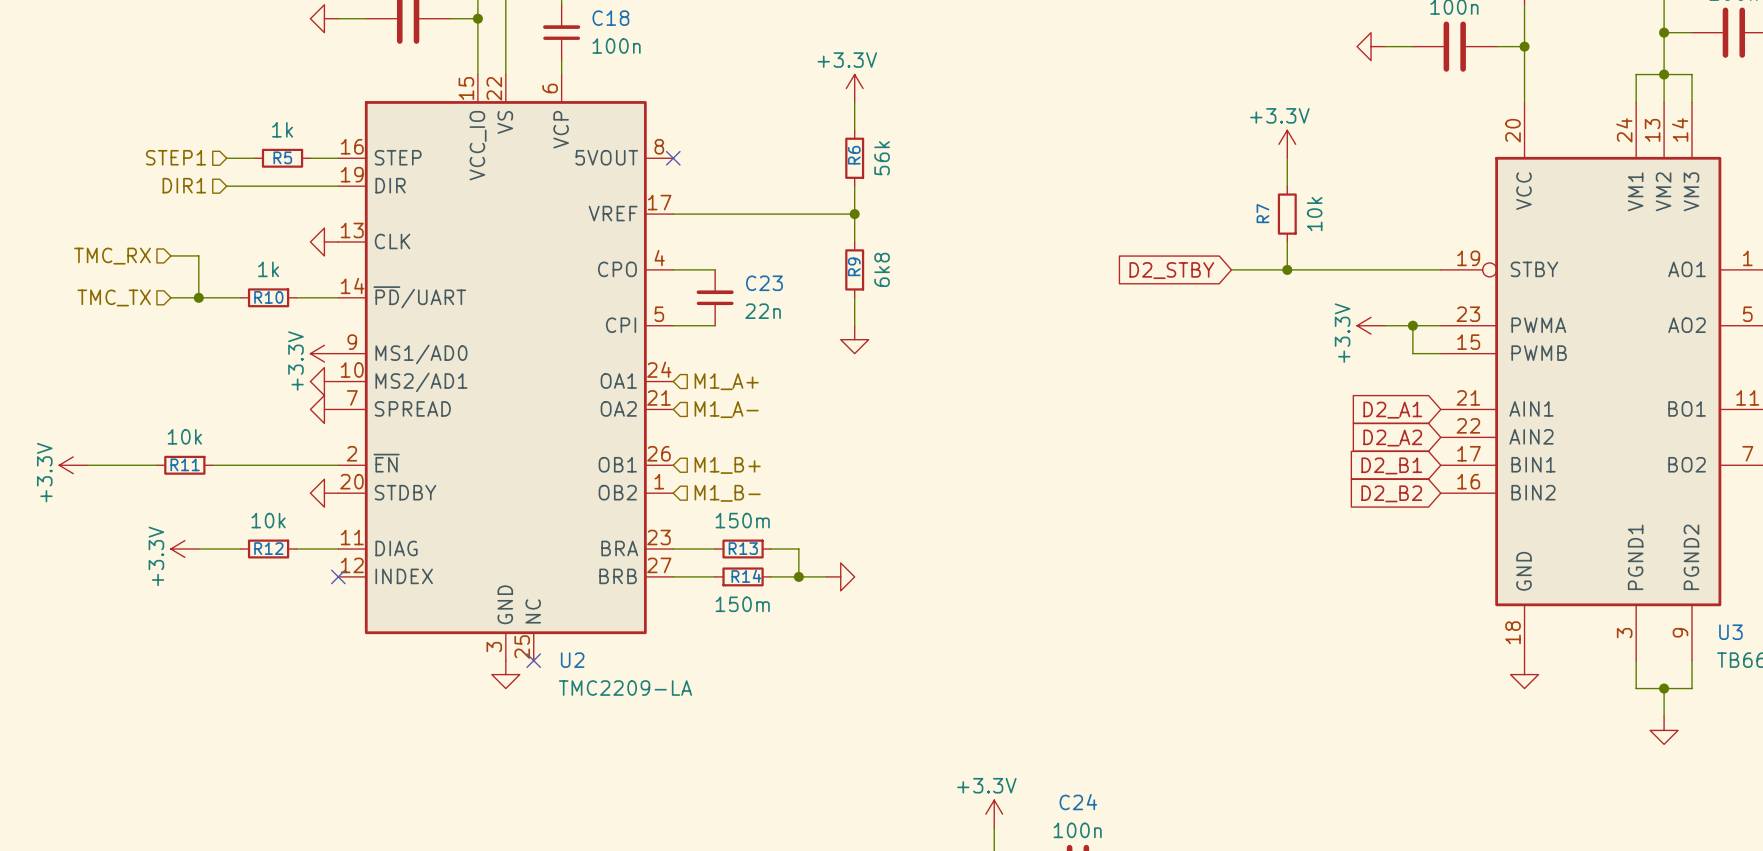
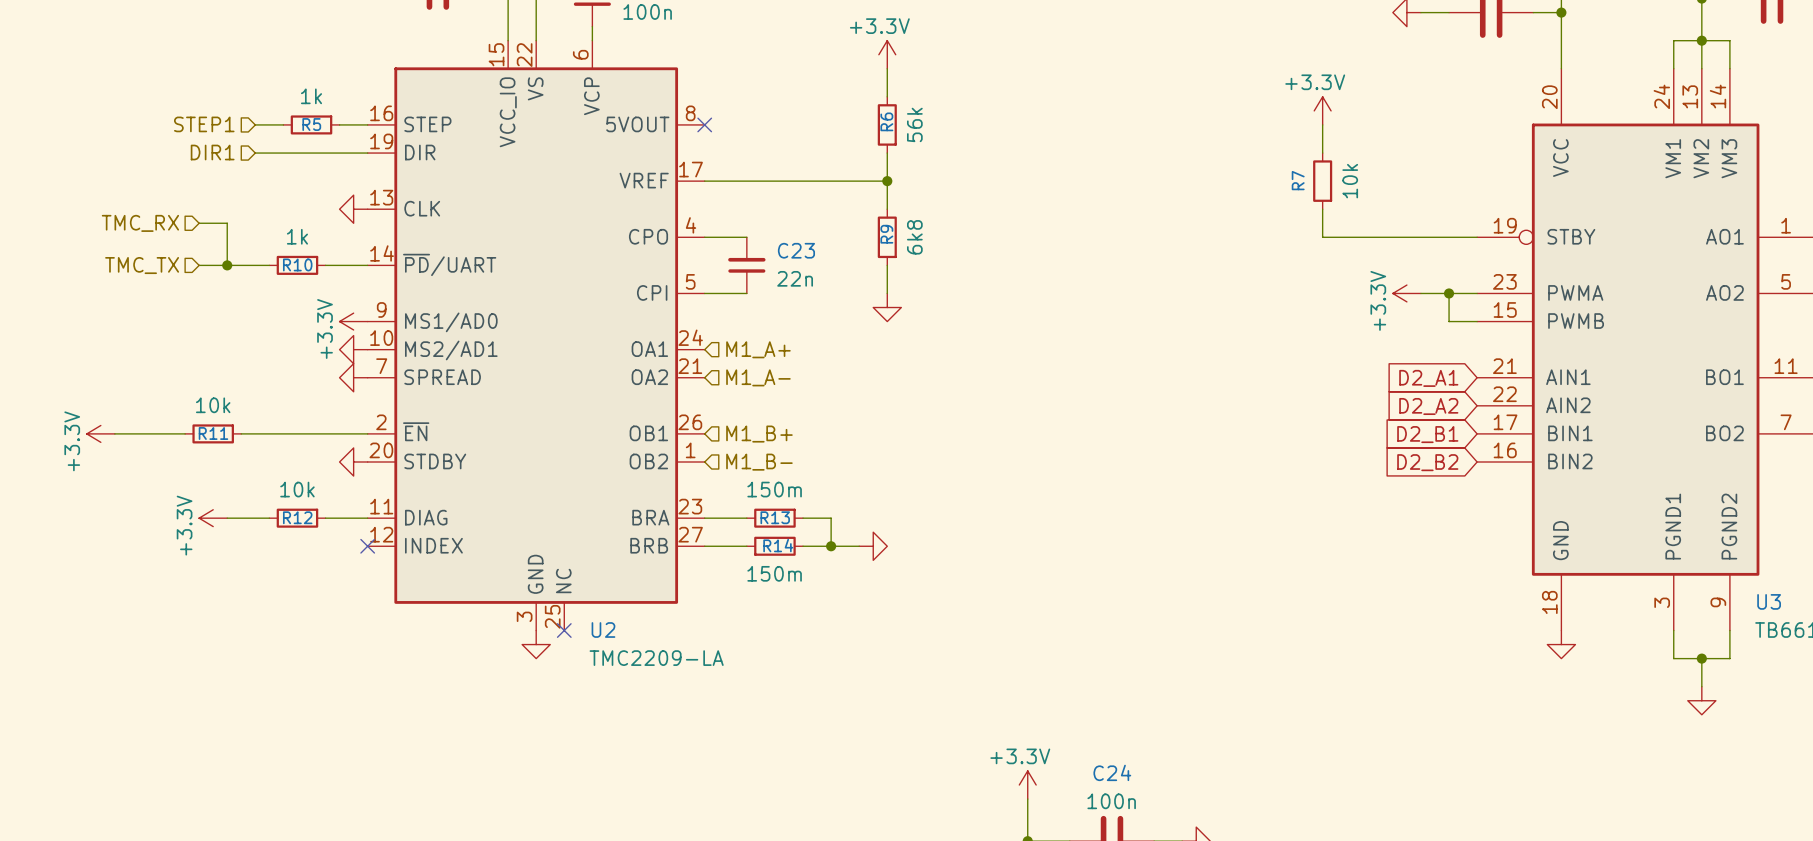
wire: (1231, 269) (1287, 269) -> none
junction: (1287, 269) -> none
global label: D2_STBY (1171, 270) -> none

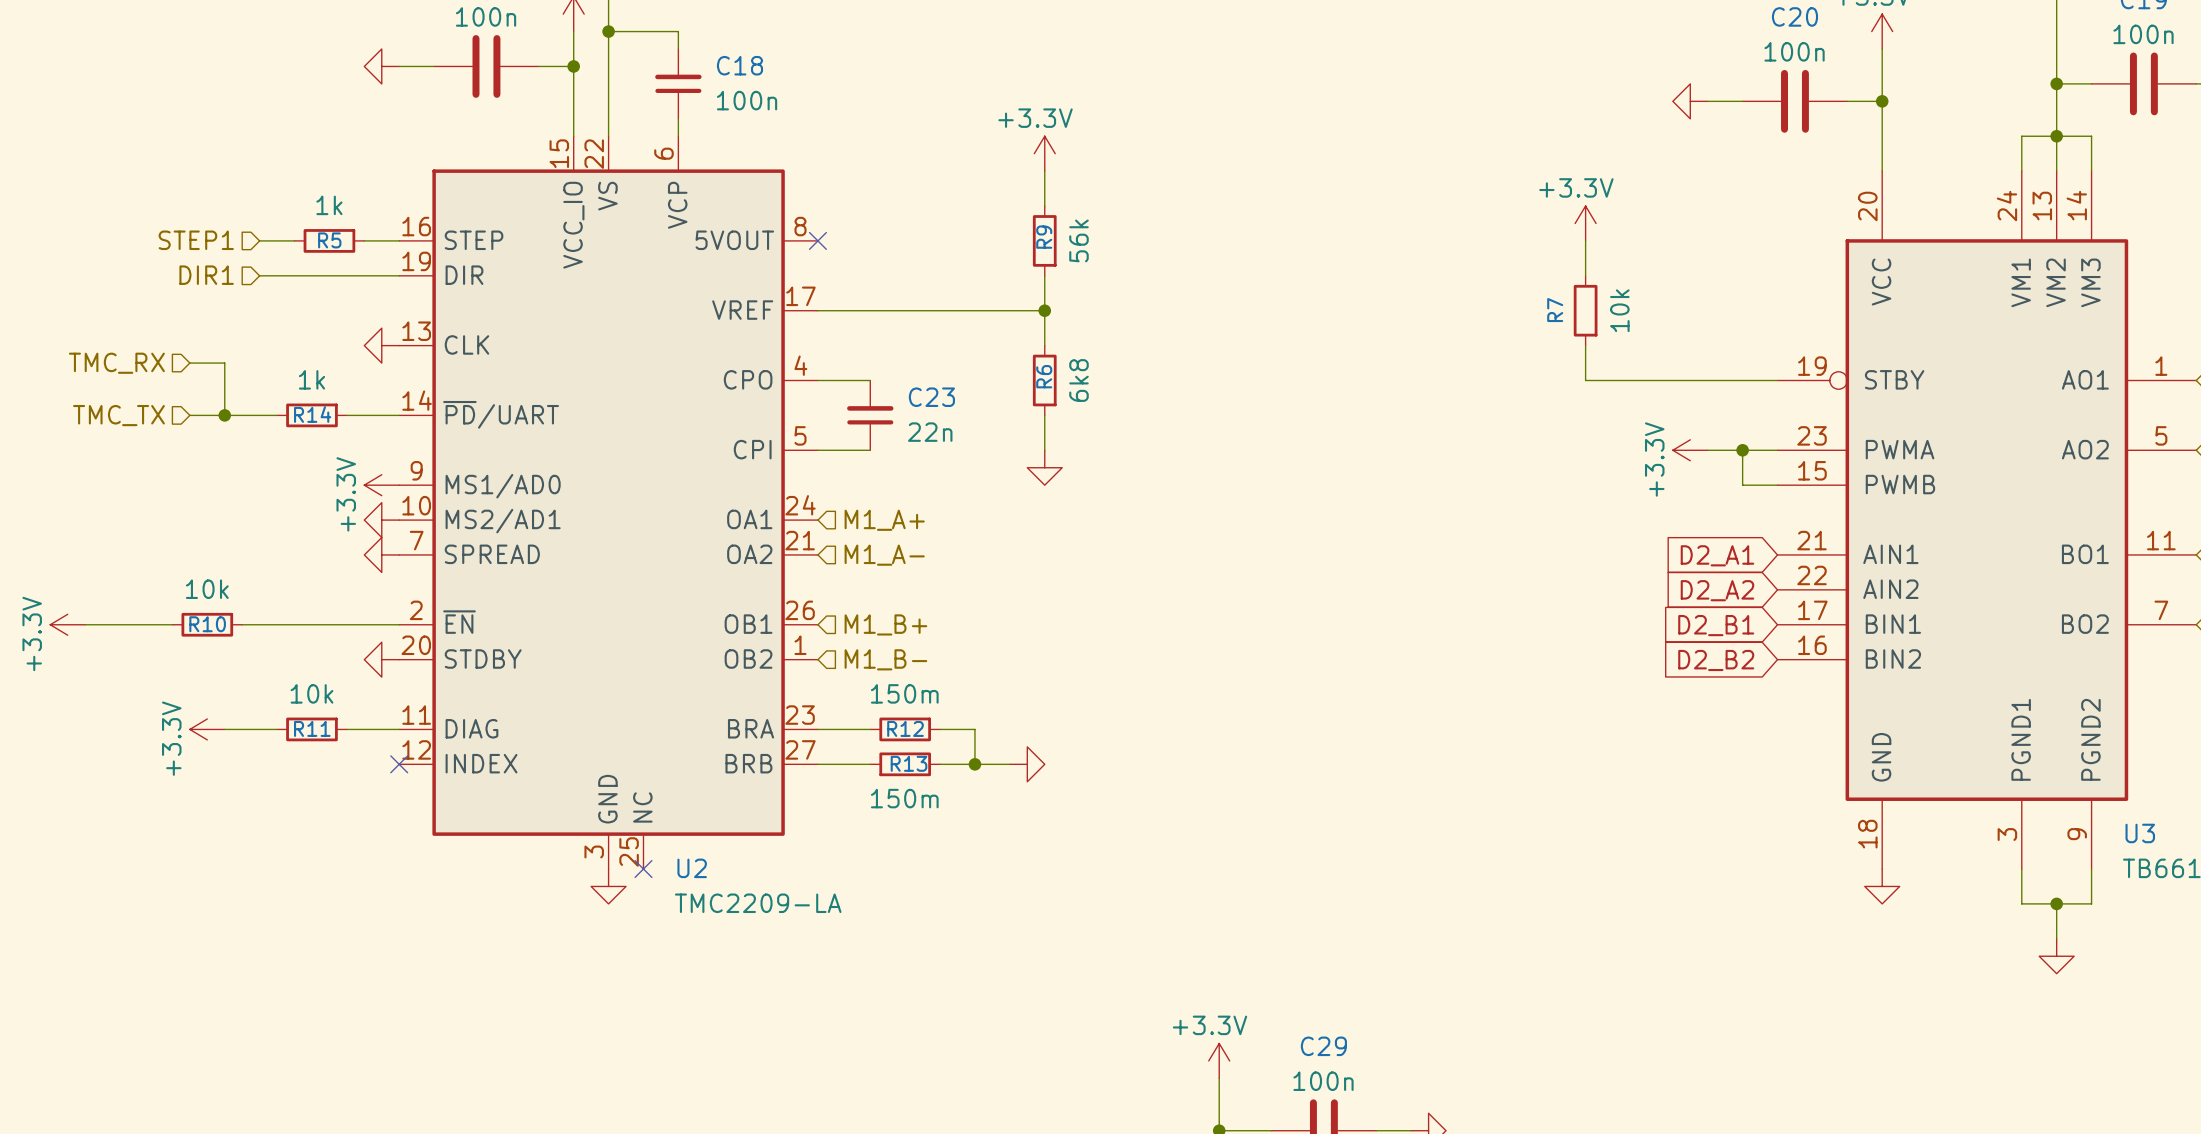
R6 name: R6 (886, 121) -> R9 (1044, 237)
R9 name: R9 (886, 234) -> R6 (1044, 376)
R10 name: R10 (297, 264) -> R14 (312, 414)
R11 name: R11 (213, 433) -> R10 (207, 624)
R12 name: R12 (297, 517) -> R11 (312, 728)
R13 name: R13 (775, 517) -> R12 (905, 728)
R14 name: R14 (778, 545) -> R13 (909, 763)
C24 name: C24 (1112, 772) -> C29 (1323, 1046)

